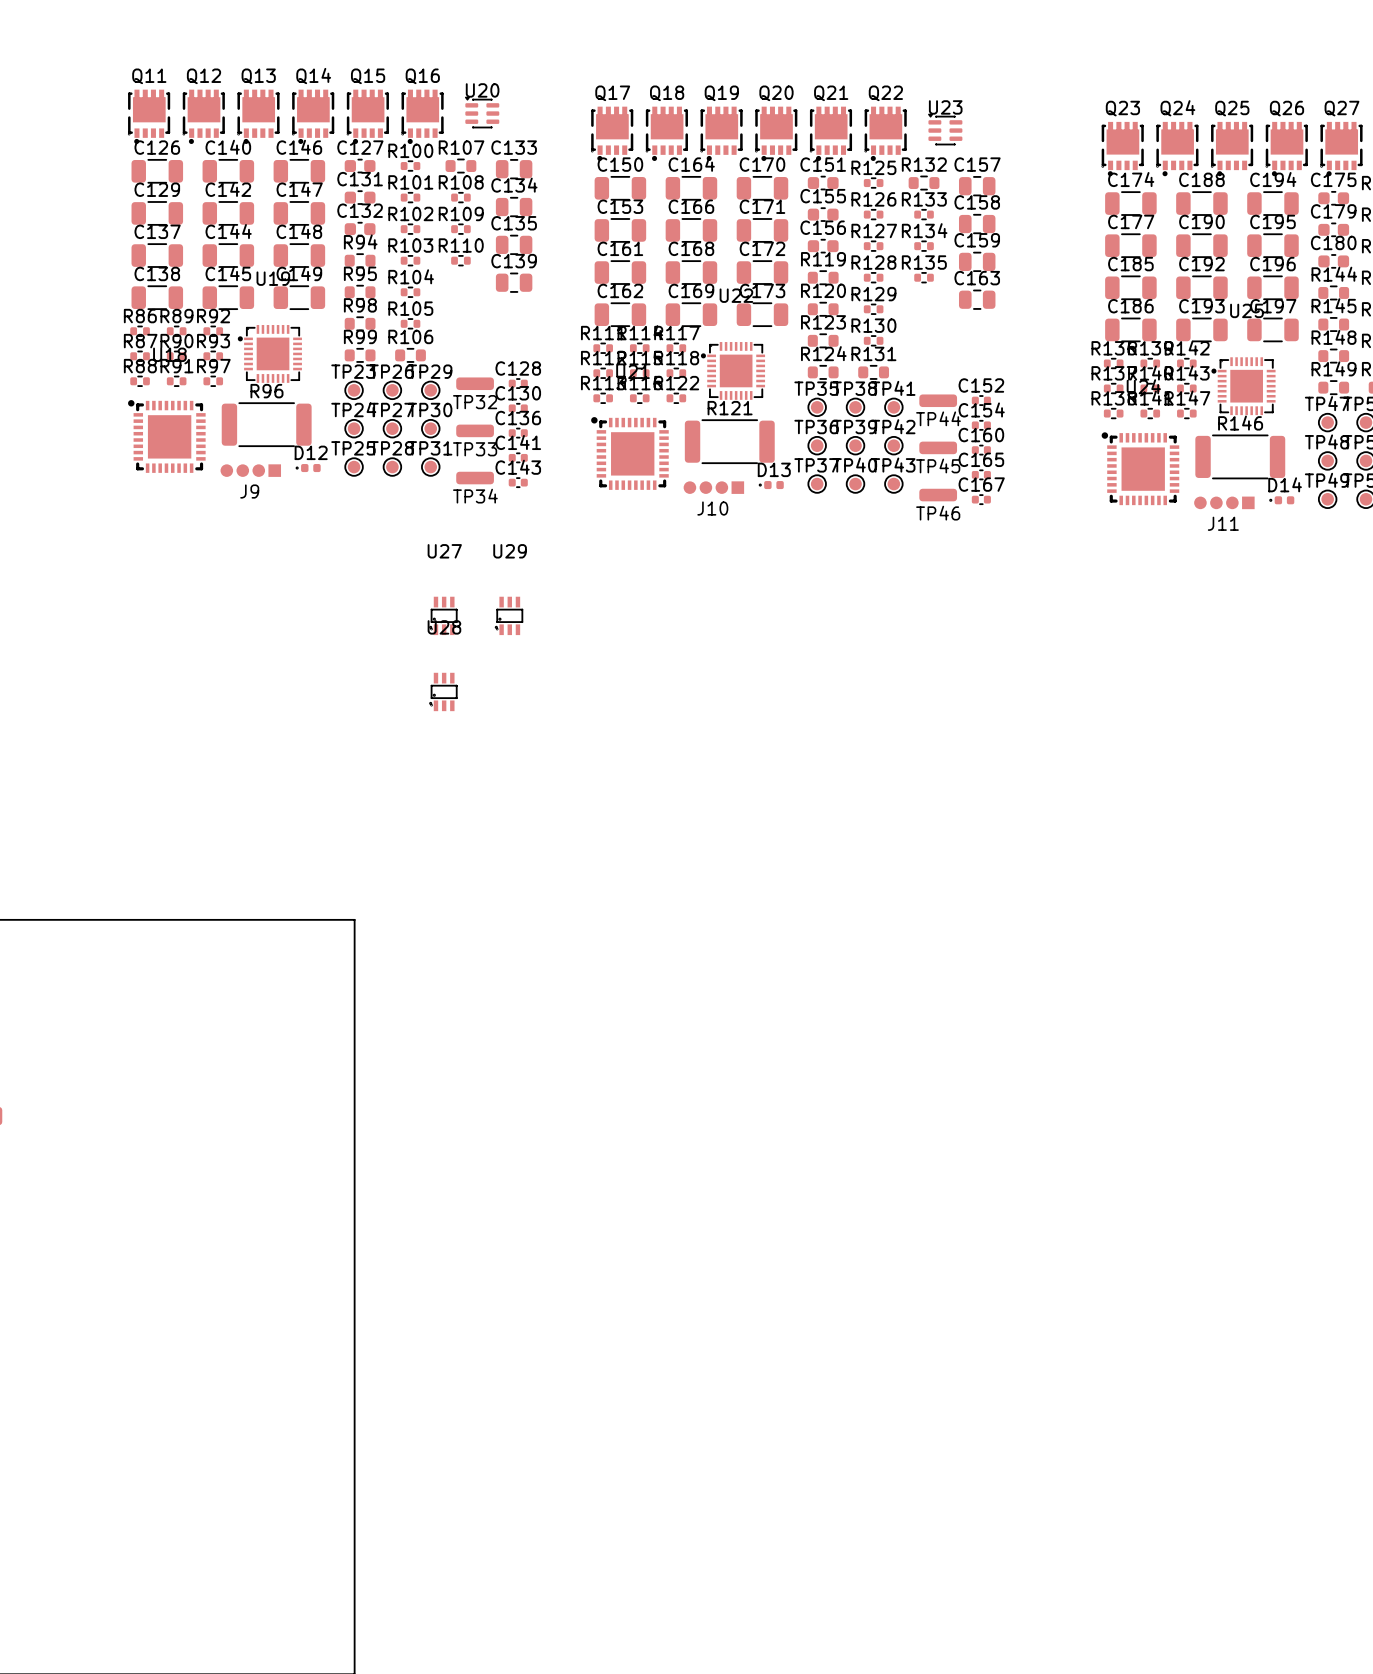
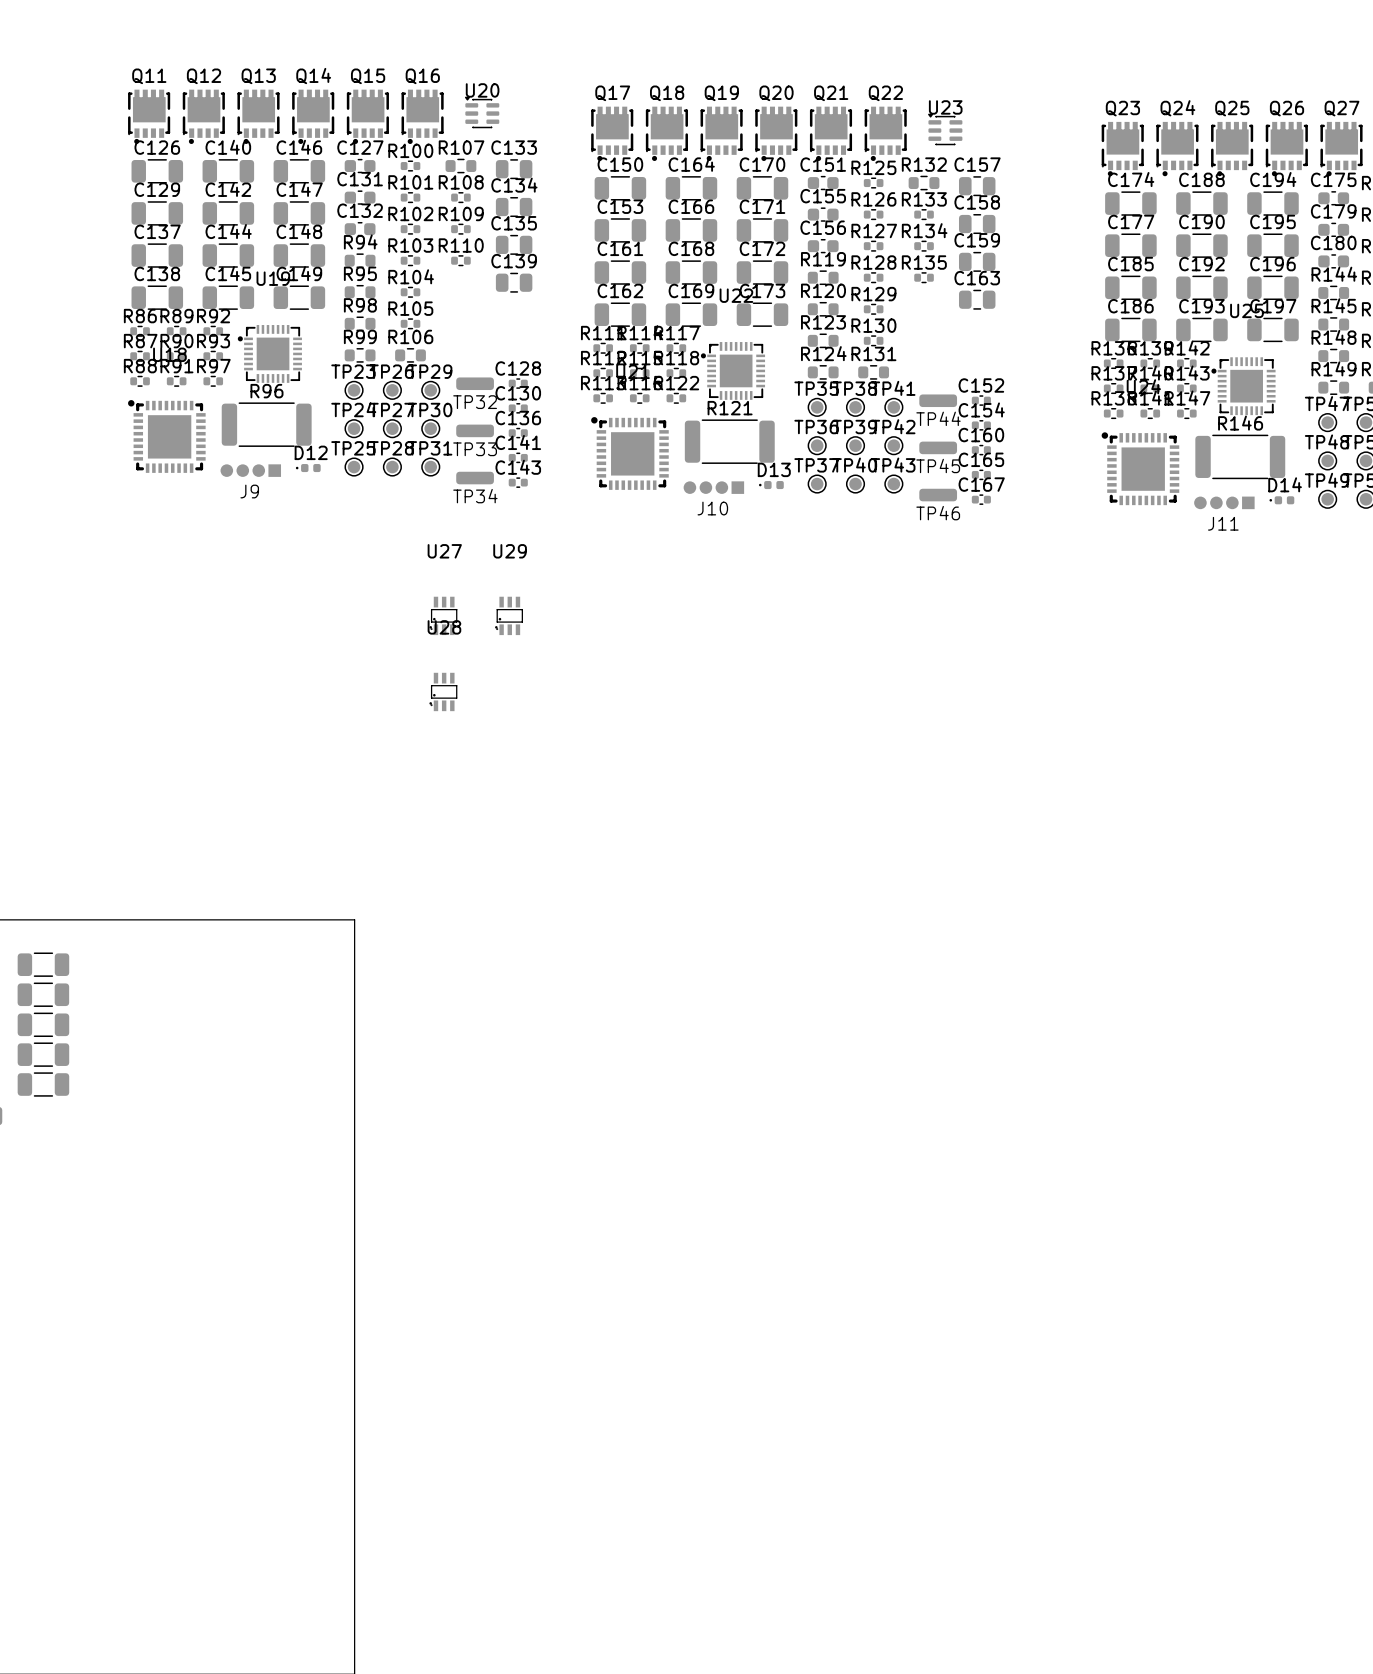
part: none -> (43, 964)
part: none -> (43, 994)
part: none -> (43, 1024)
part: none -> (43, 1054)
part: none -> (43, 1084)

